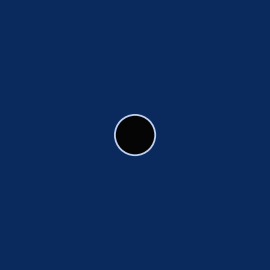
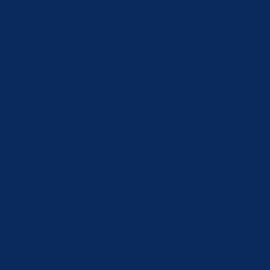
part: (135, 135) -> none

